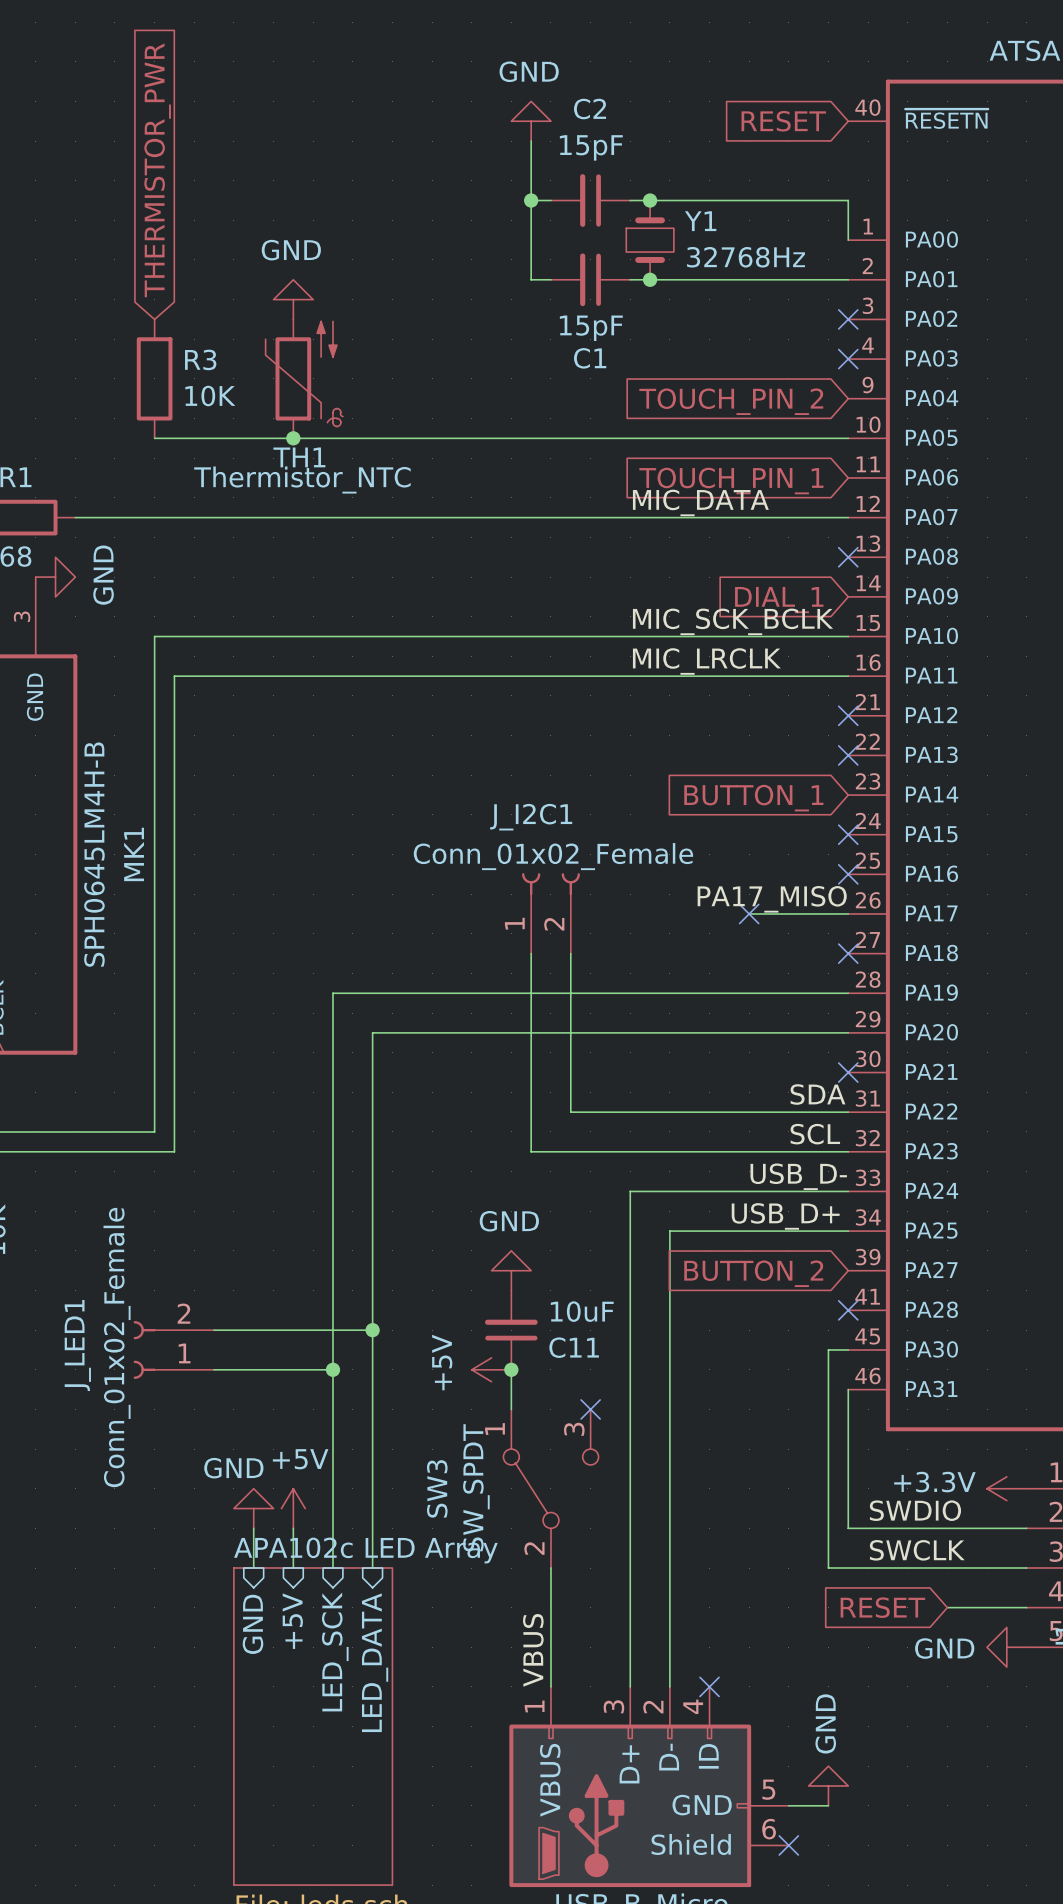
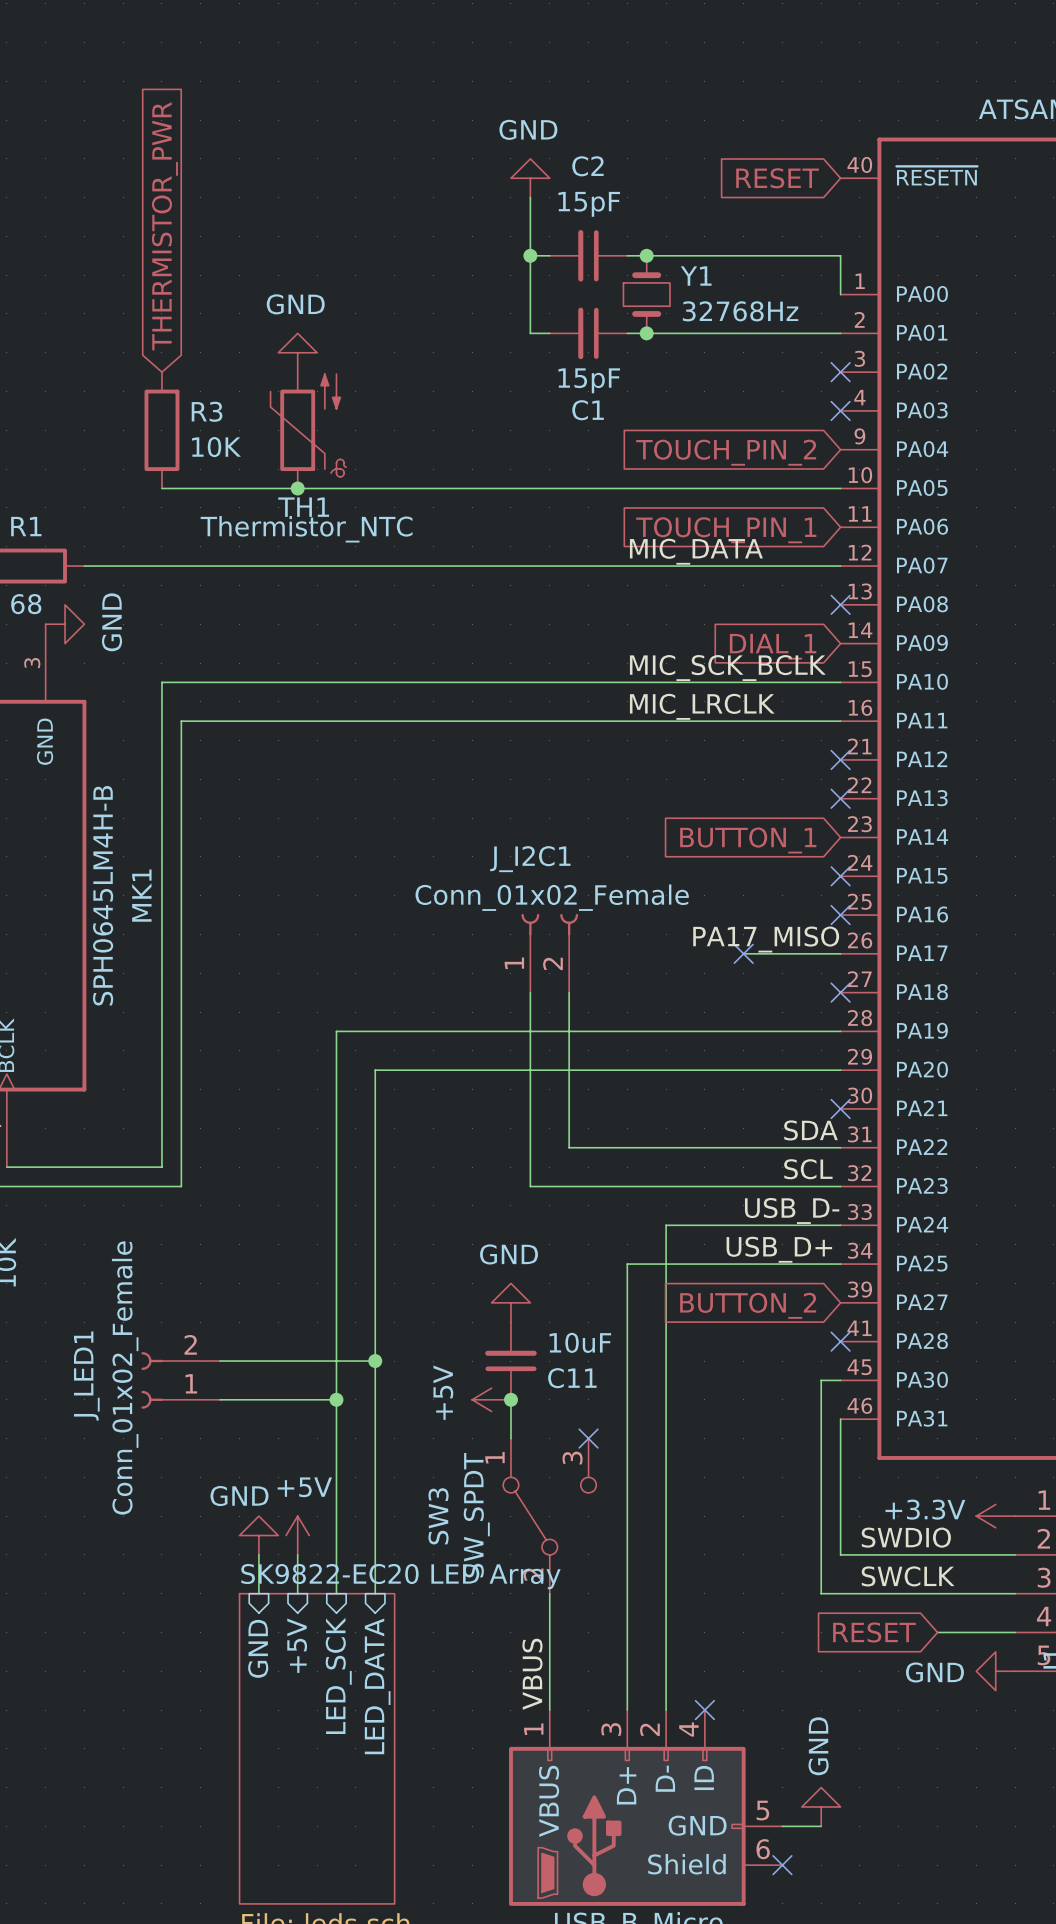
wire: (669, 1191) (630, 1191) (630, 1231) -> (666, 1225) (666, 1264) (627, 1264)
sheet APA102c LED Array name: APA102c LED Array (365, 1550) -> SK9822-EC20 LED Array (400, 1576)

